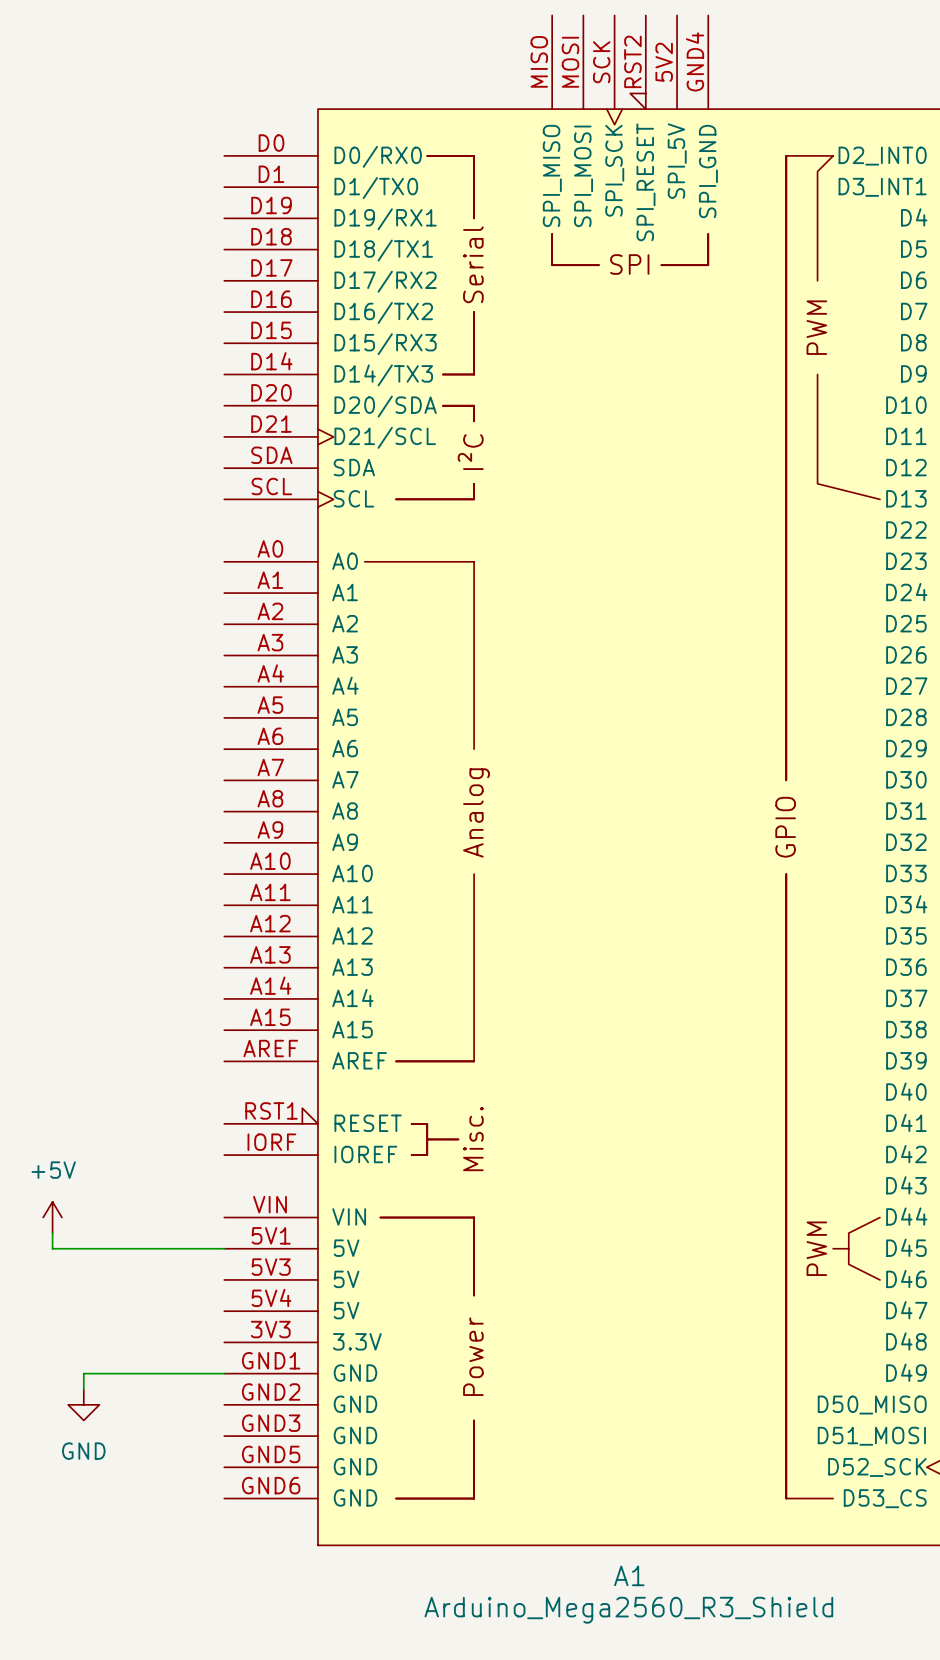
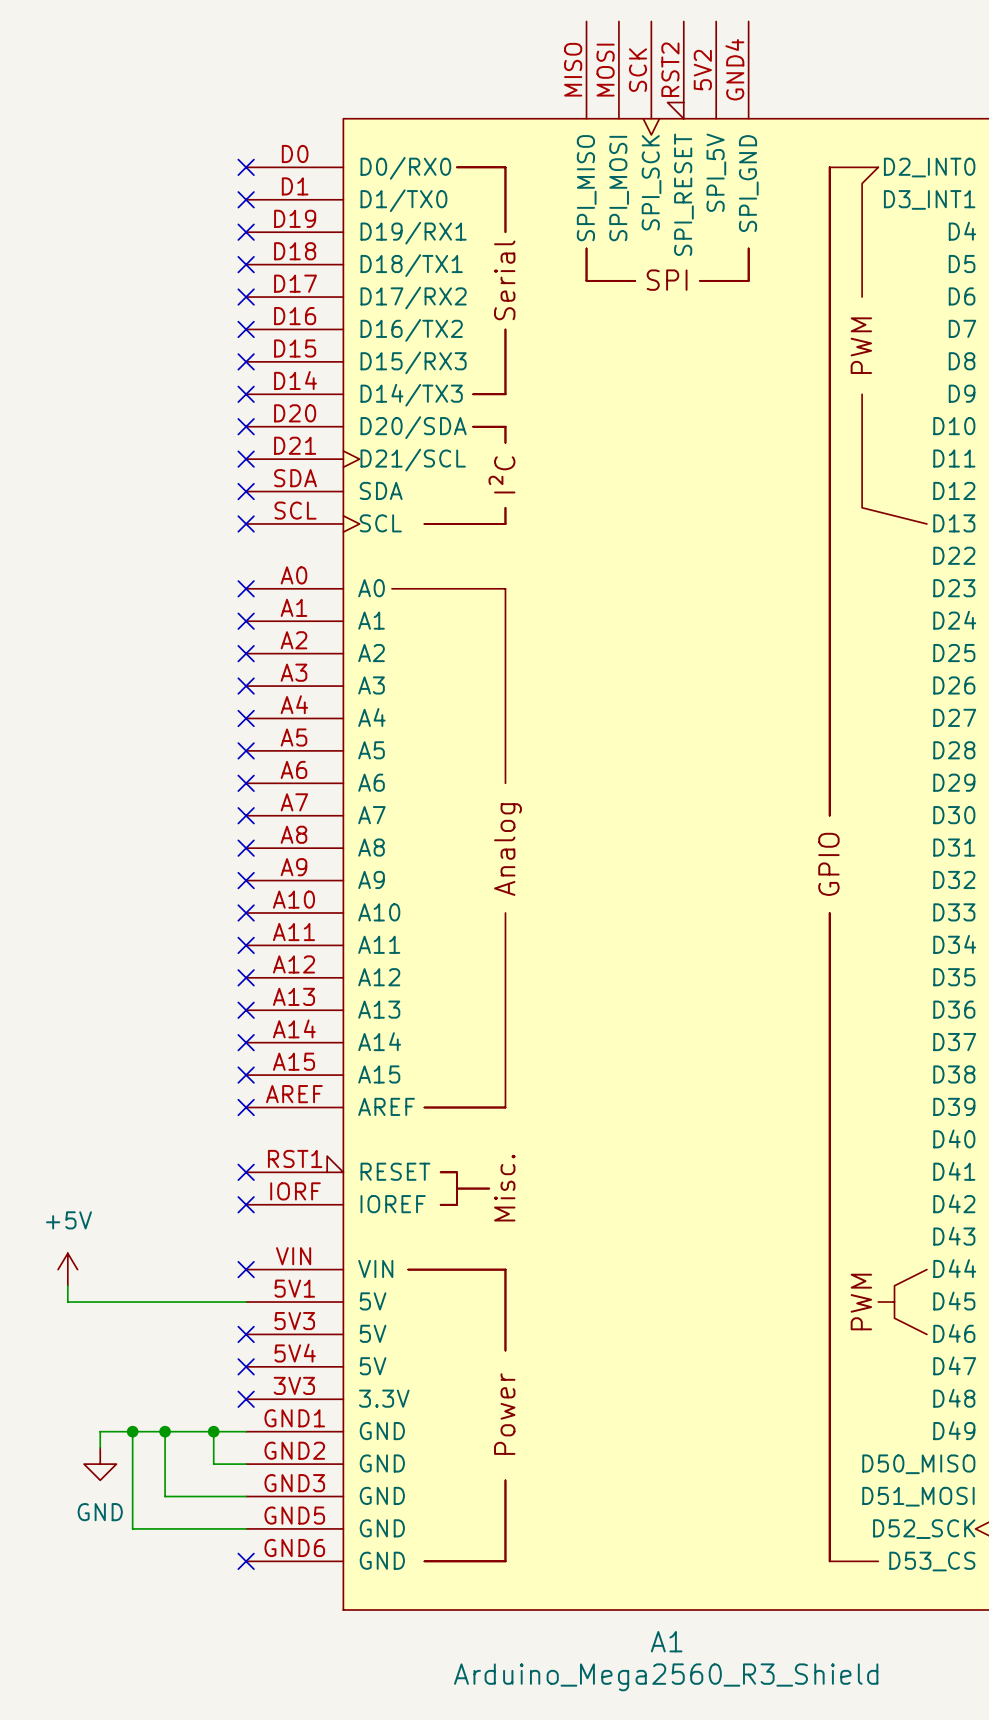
no-connect mark: none -> (246, 167)
no-connect mark: none -> (246, 199)
no-connect mark: none -> (246, 232)
no-connect mark: none -> (246, 264)
no-connect mark: none -> (246, 297)
no-connect mark: none -> (246, 329)
no-connect mark: none -> (246, 361)
no-connect mark: none -> (246, 394)
no-connect mark: none -> (246, 426)
no-connect mark: none -> (246, 459)
no-connect mark: none -> (246, 491)
no-connect mark: none -> (246, 523)
no-connect mark: none -> (246, 588)
no-connect mark: none -> (246, 621)
no-connect mark: none -> (246, 653)
no-connect mark: none -> (246, 686)
no-connect mark: none -> (246, 718)
no-connect mark: none -> (246, 750)
no-connect mark: none -> (246, 783)
no-connect mark: none -> (246, 815)
no-connect mark: none -> (246, 848)
no-connect mark: none -> (246, 880)
no-connect mark: none -> (246, 912)
no-connect mark: none -> (246, 945)
no-connect mark: none -> (246, 977)
no-connect mark: none -> (246, 1010)
no-connect mark: none -> (246, 1042)
no-connect mark: none -> (246, 1075)
no-connect mark: none -> (246, 1107)
no-connect mark: none -> (246, 1172)
no-connect mark: none -> (246, 1204)
no-connect mark: none -> (246, 1269)
no-connect mark: none -> (246, 1334)
no-connect mark: none -> (246, 1366)
no-connect mark: none -> (246, 1399)
wire: none -> (132, 1431) (132, 1528) (246, 1528)
junction: none -> (132, 1431)
wire: none -> (165, 1431) (165, 1496) (246, 1496)
junction: none -> (165, 1431)
wire: none -> (213, 1431) (213, 1464) (246, 1464)
junction: none -> (213, 1431)
no-connect mark: none -> (246, 1561)

